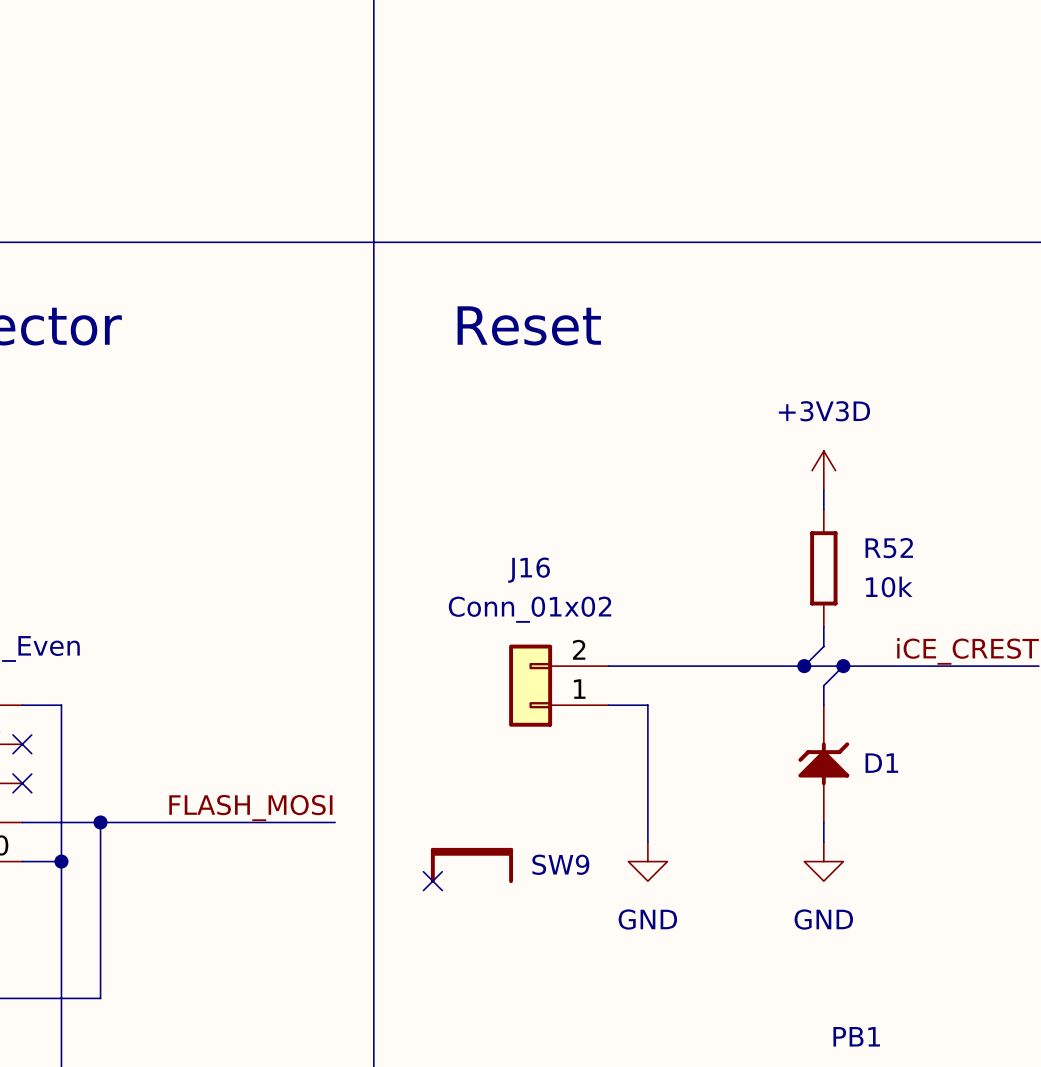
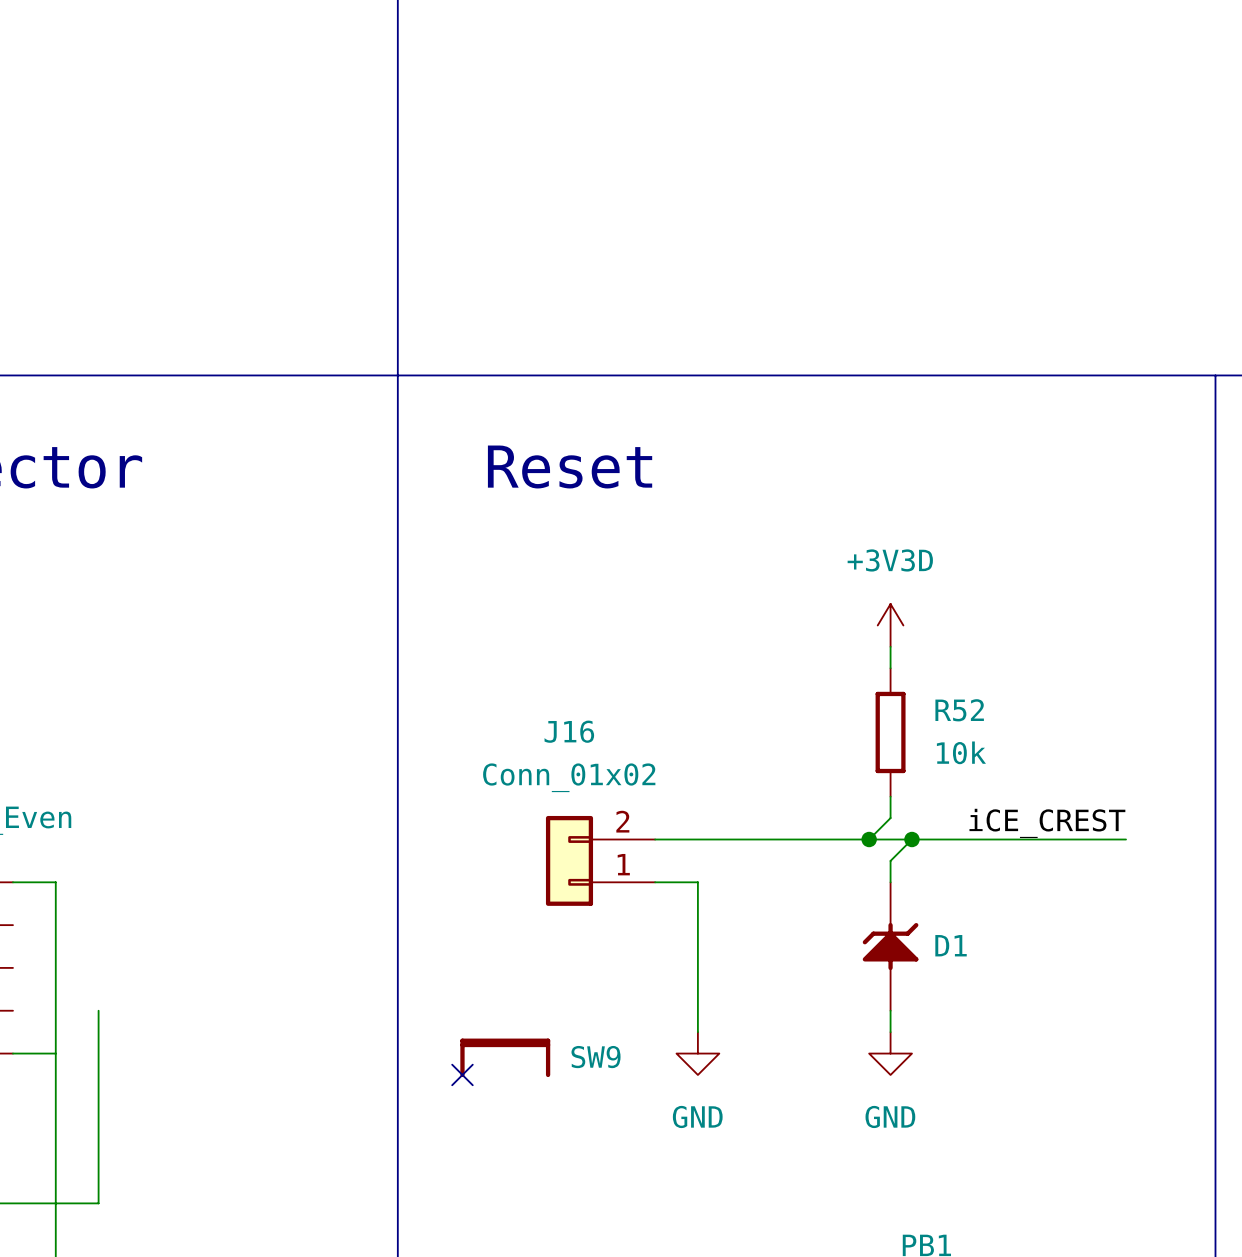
no-connect mark: (22, 744) -> none
no-connect mark: (22, 783) -> none
label: FLASH_MOSI (250, 808) -> none
wire: (22, 822) (335, 822) -> none
junction: (100, 822) -> none
junction: (61, 861) -> none

